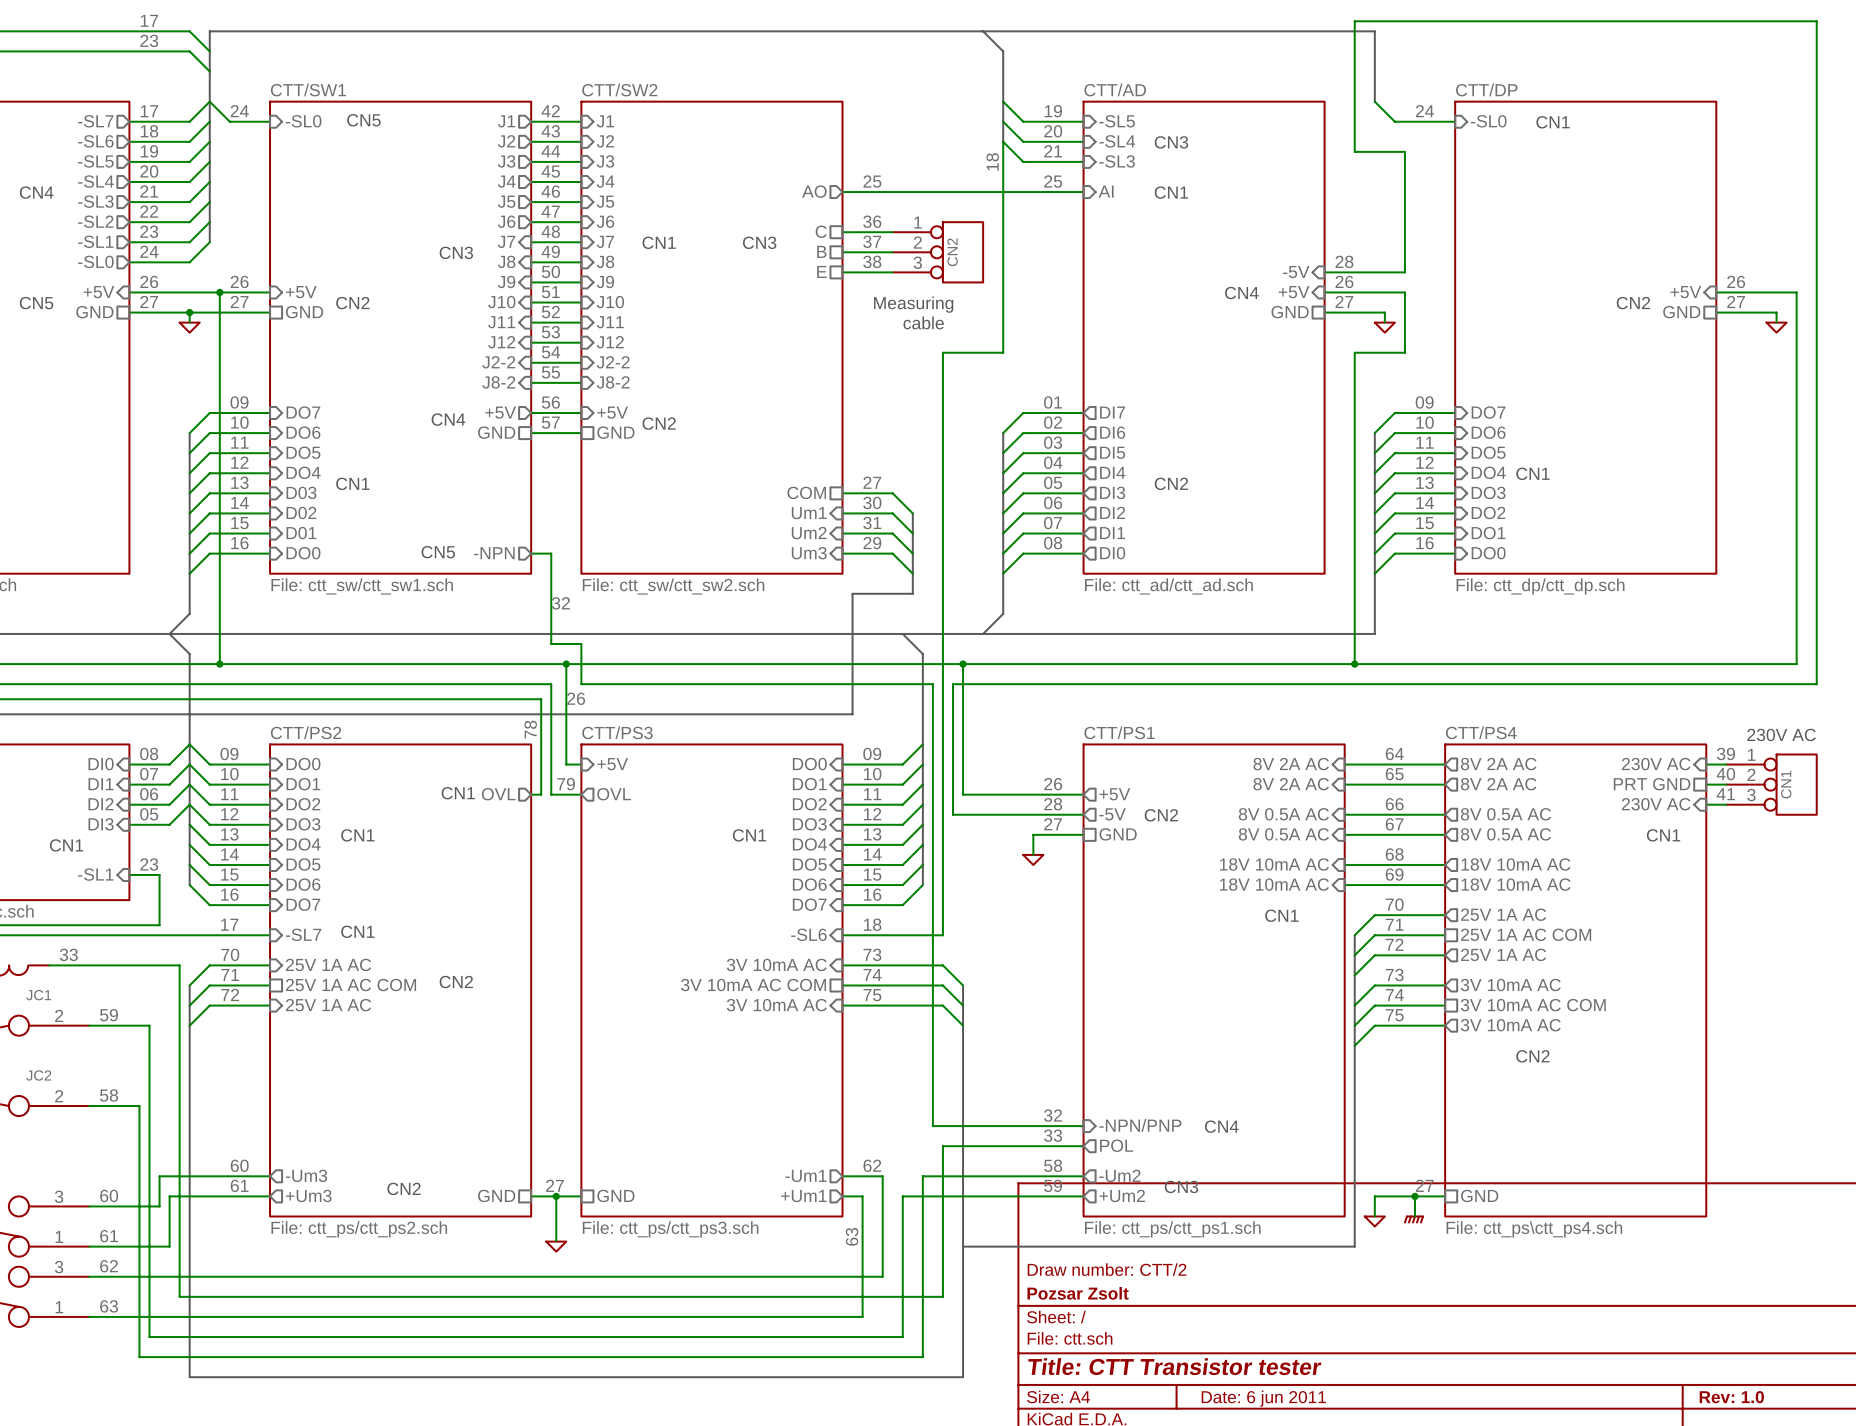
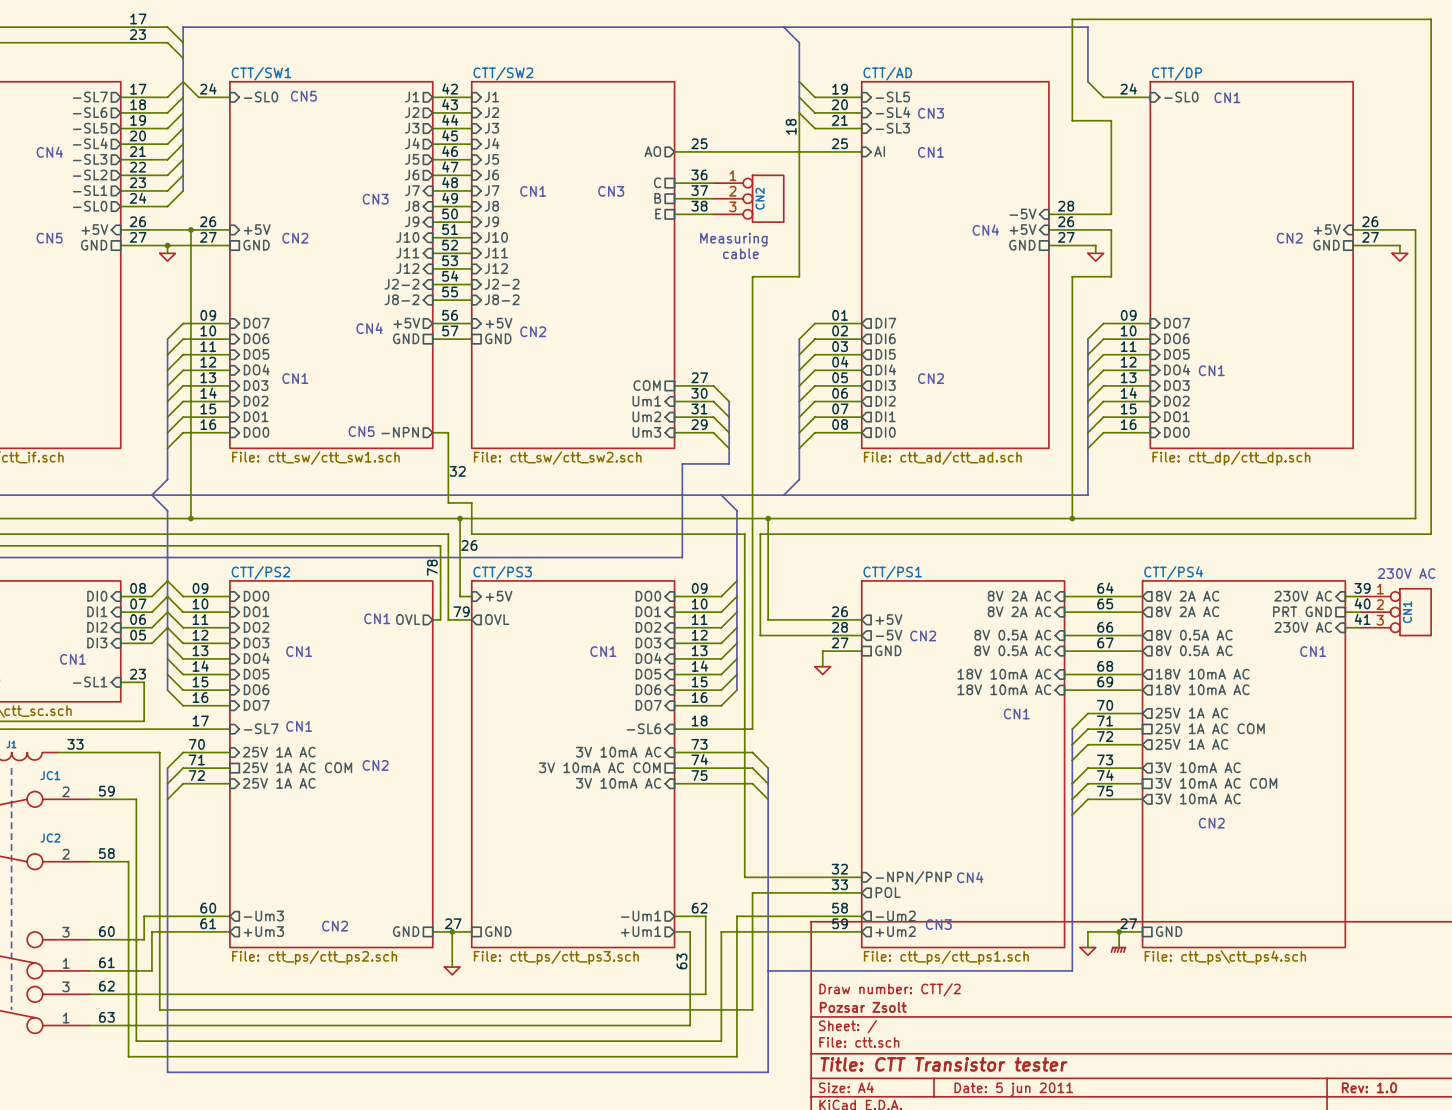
title block: Date: 6 jun 2011 (1263, 1398) -> Date: 5 jun 2011 (1013, 1089)

